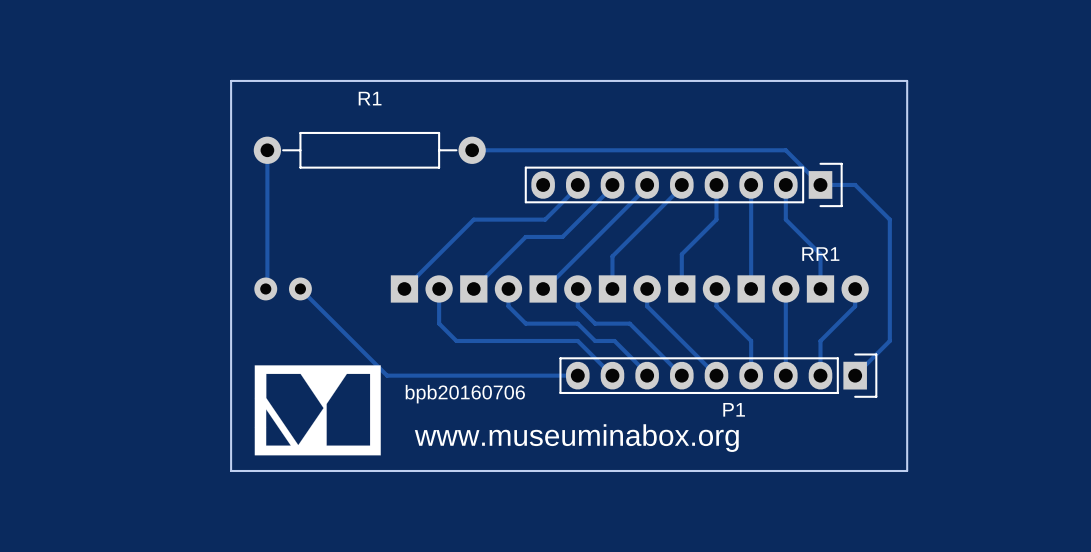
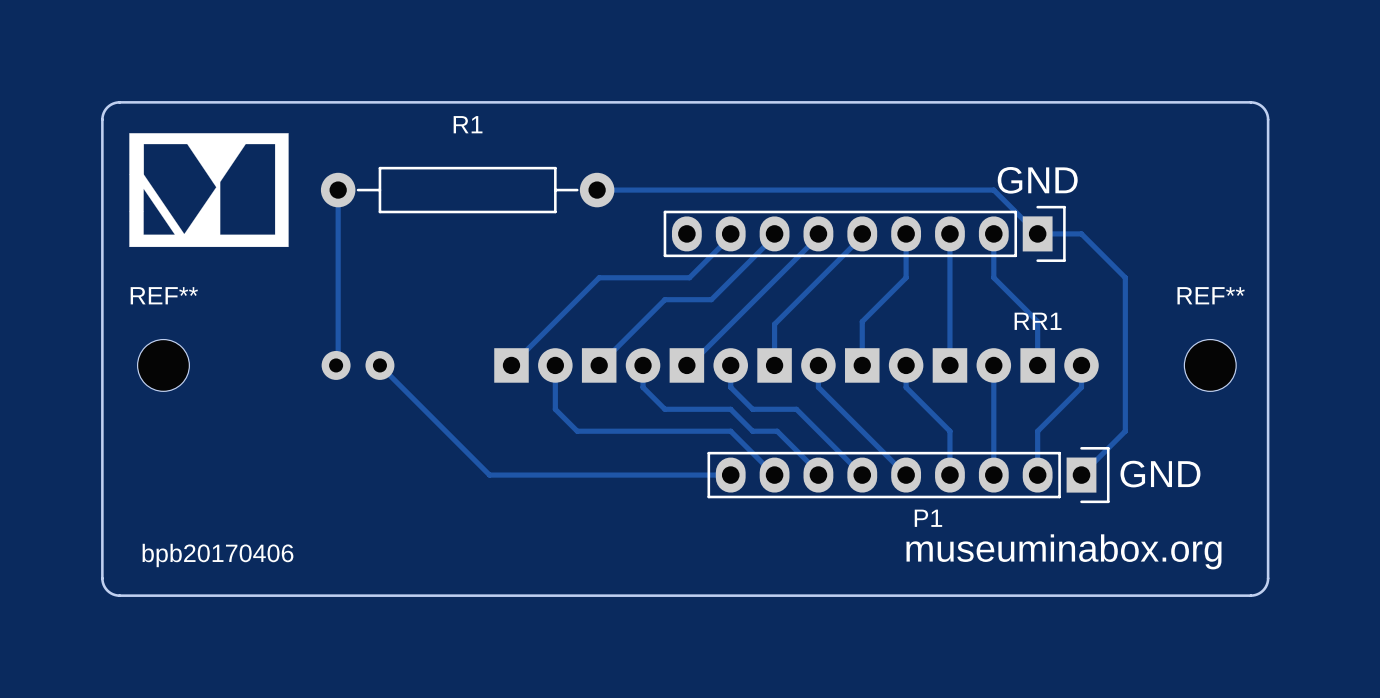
board edge: (231, 80) (231, 470) -> (292, 102) (117, 102) (107, 107) (102, 119) (103, 584) (109, 592) (119, 595) (292, 595)
board edge: (907, 80) (907, 470) -> (1147, 102) (1253, 102) (1264, 109) (1268, 119) (1267, 582) (1263, 590) (1253, 595) (1147, 595)
text: none -> GND (1037, 180)
REF**: none -> (163, 365)
REF**: none -> (1210, 365)
text: none -> GND (1160, 474)
text: bpb20160706 (465, 394) -> none
drawing position: (317, 410) -> (208, 190)
text: www.museuminabox.org (576, 438) -> museuminabox.org (1064, 551)
text: none -> bpb20170406 (217, 555)

